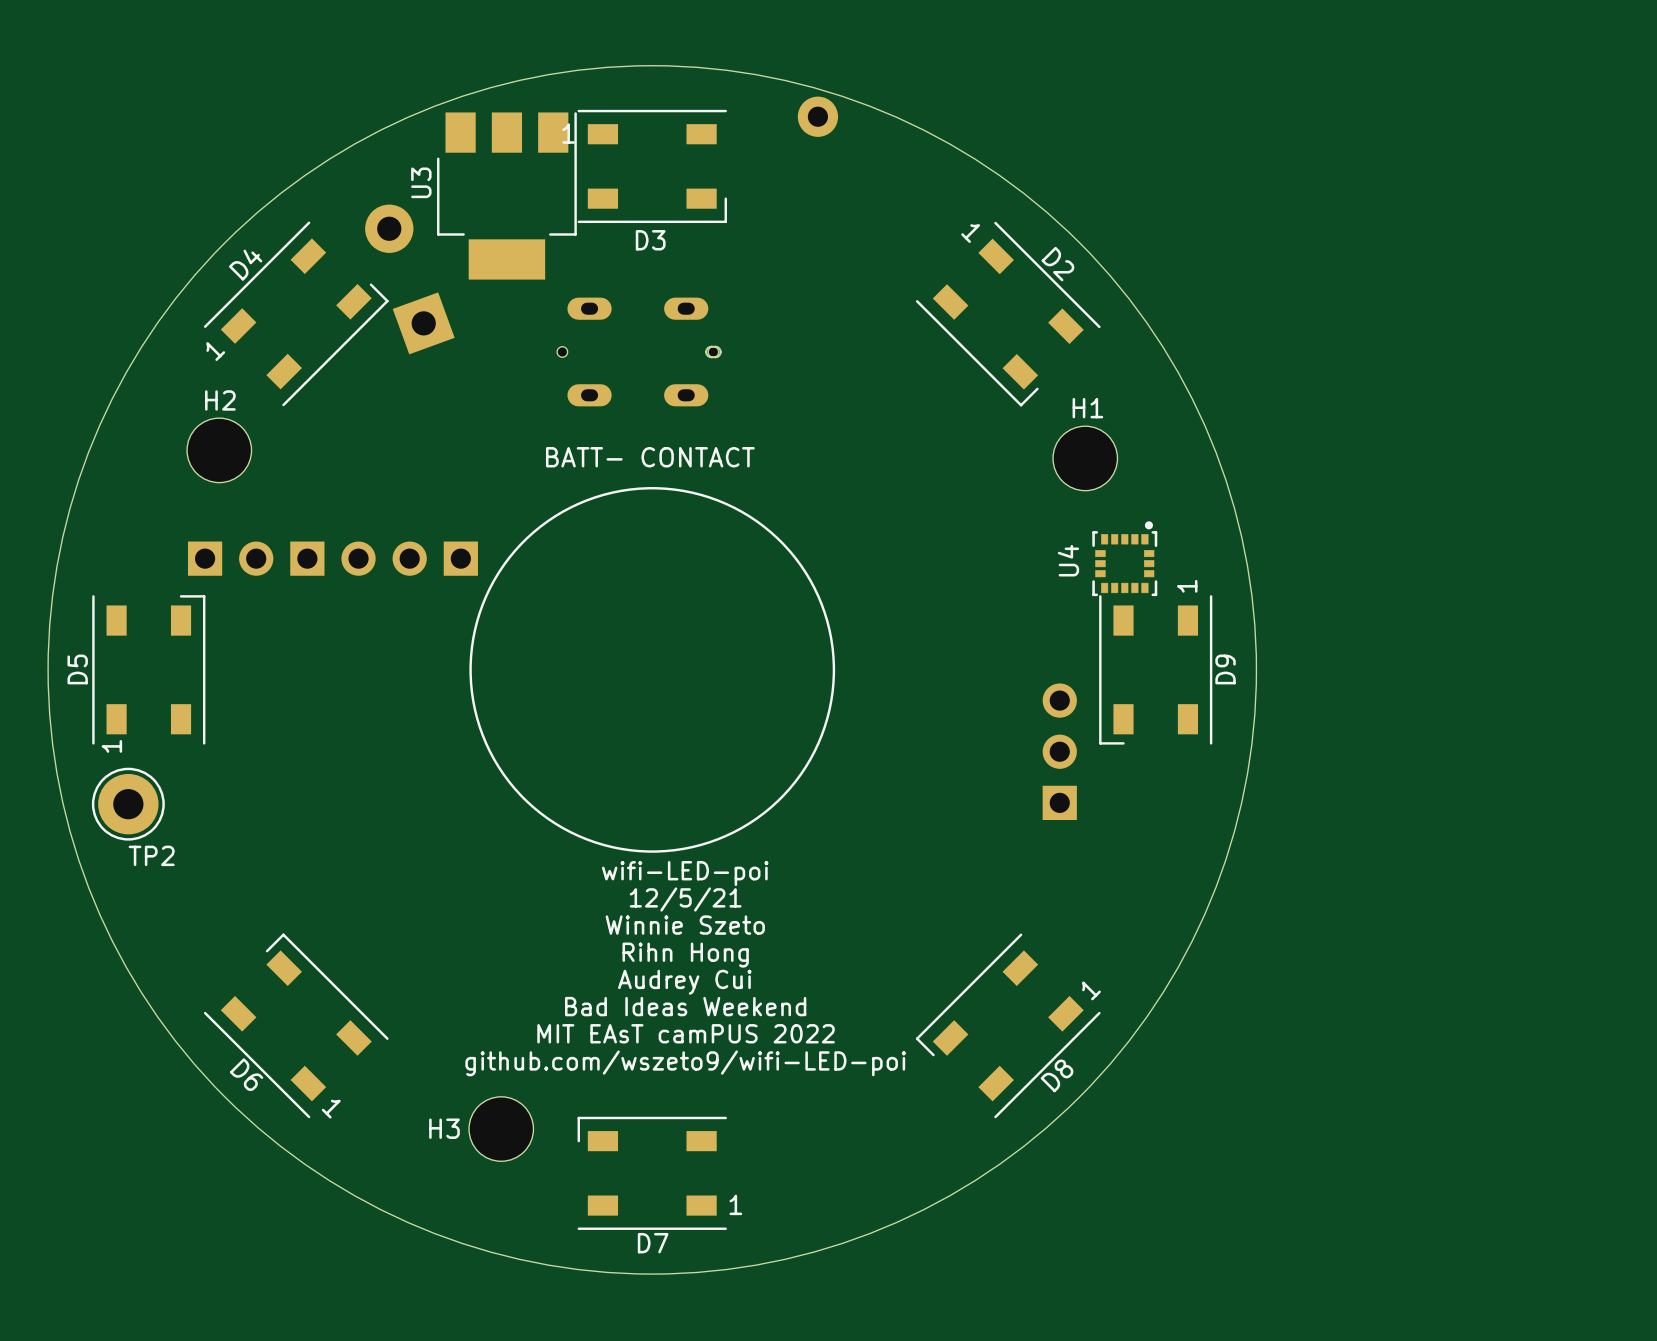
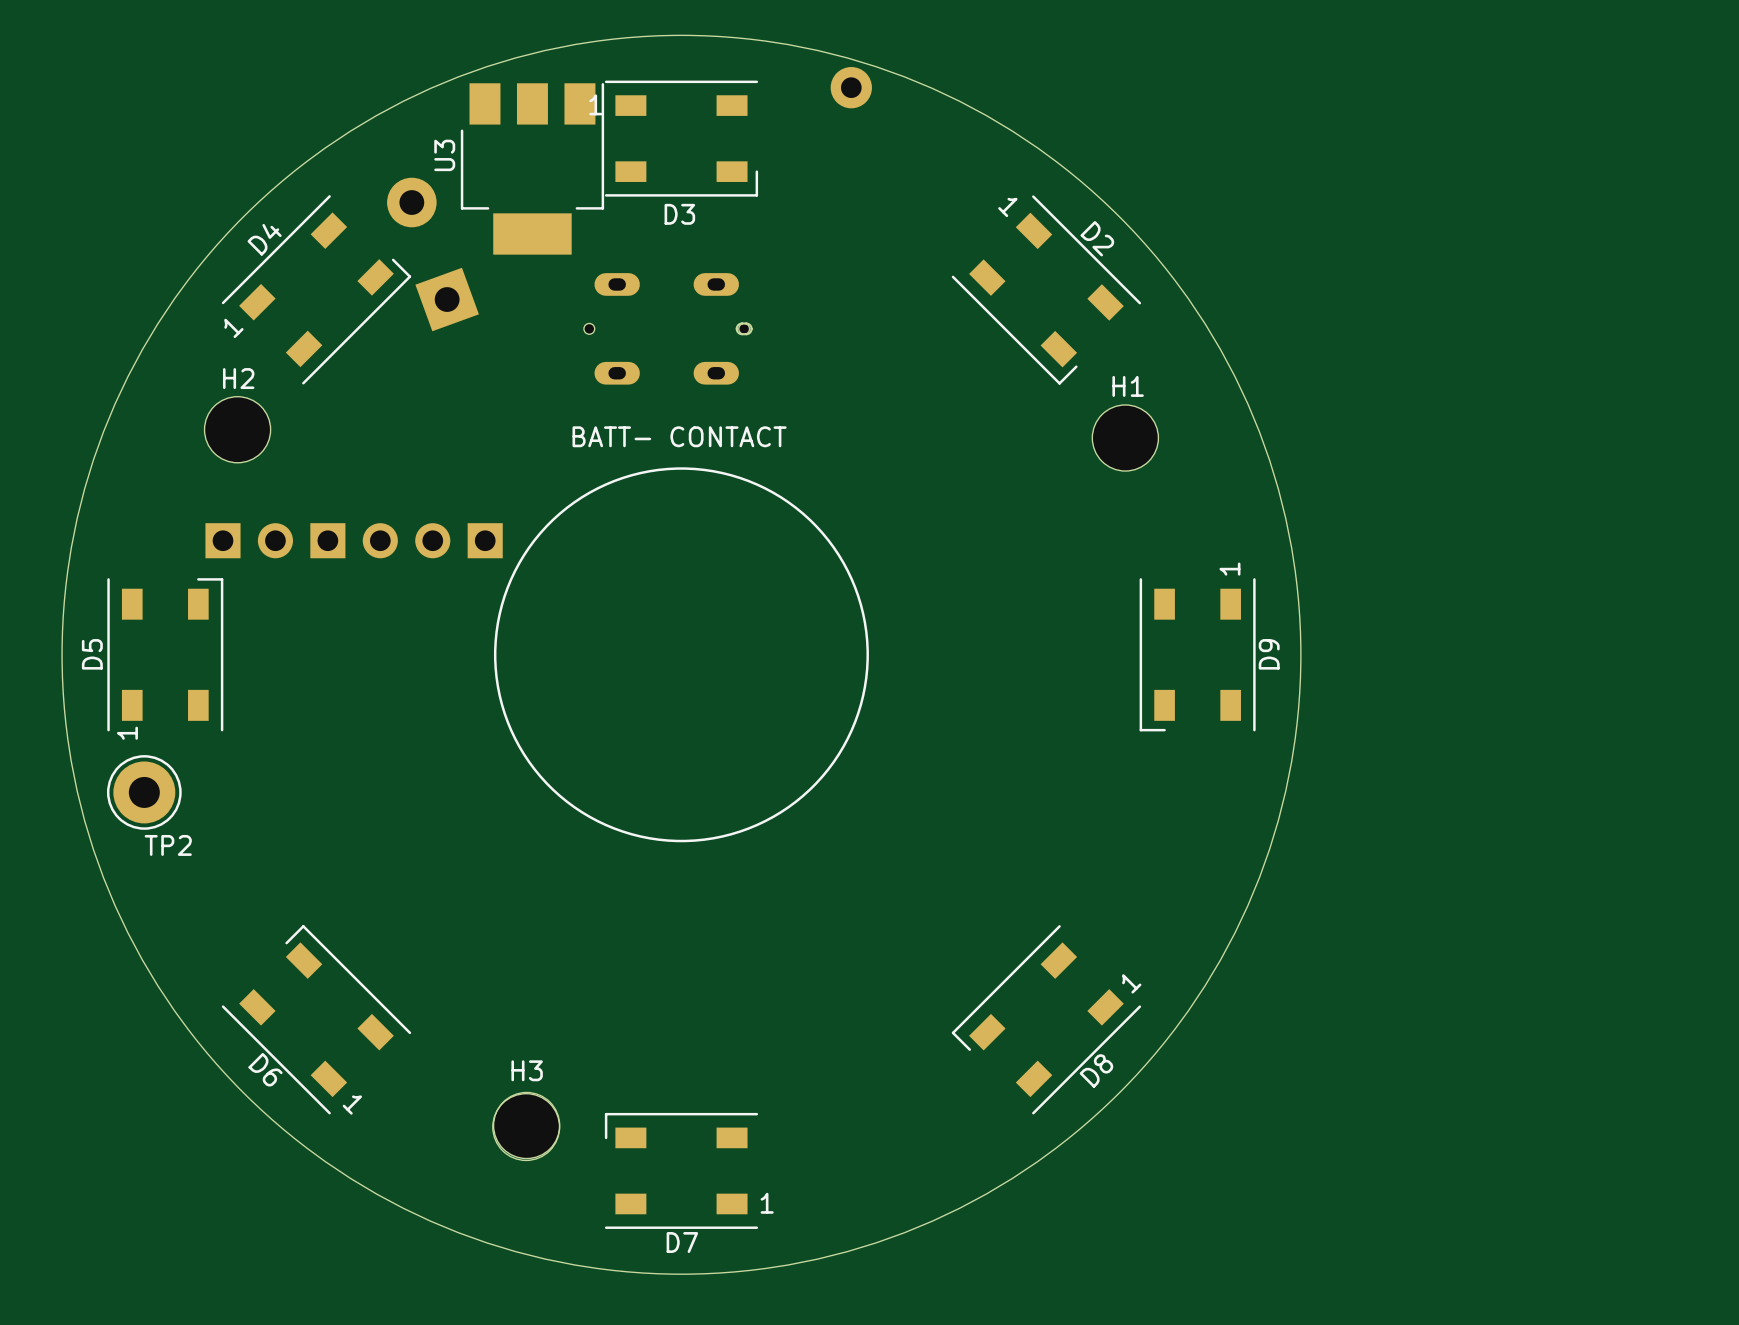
U4: (1124, 558) -> none
part: (1059, 751) -> none
text: wifi-LED-poi (685, 873) -> none
text: 12/5/21 (685, 899) -> none
text: Winnie Szeto (685, 925) -> none
text: Rihn Hong (685, 955) -> none
text: Audrey Cui (684, 982) -> none
text: Bad Ideas Weekend (685, 1006) -> none
text: MIT EAsT camPUS 2022 (686, 1033) -> none
text: github.com/wszeto9/wifi-LED-poi (685, 1063) -> none
round board edge: none -> [492, 1093, 561, 1161]
H3 name position: H3 (444, 1128) -> H3 (527, 1070)

